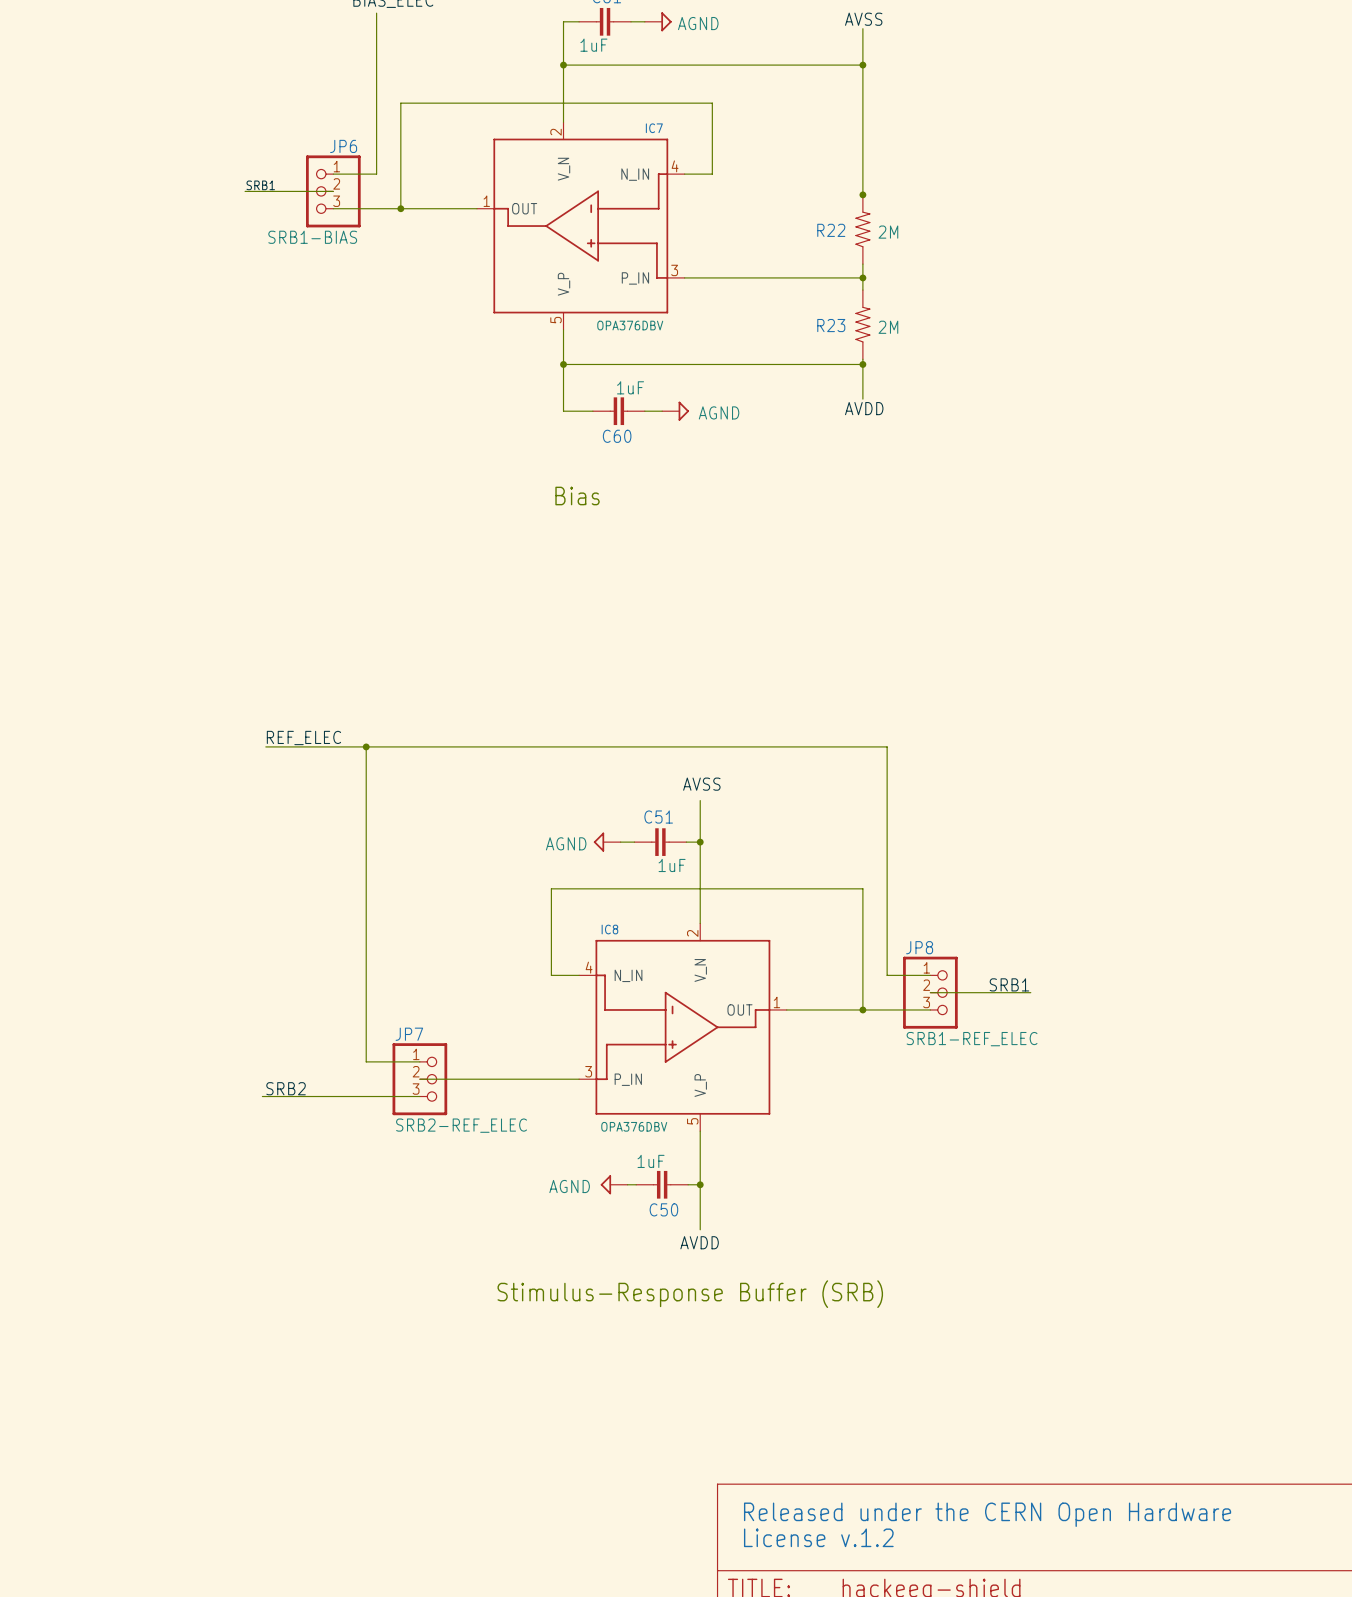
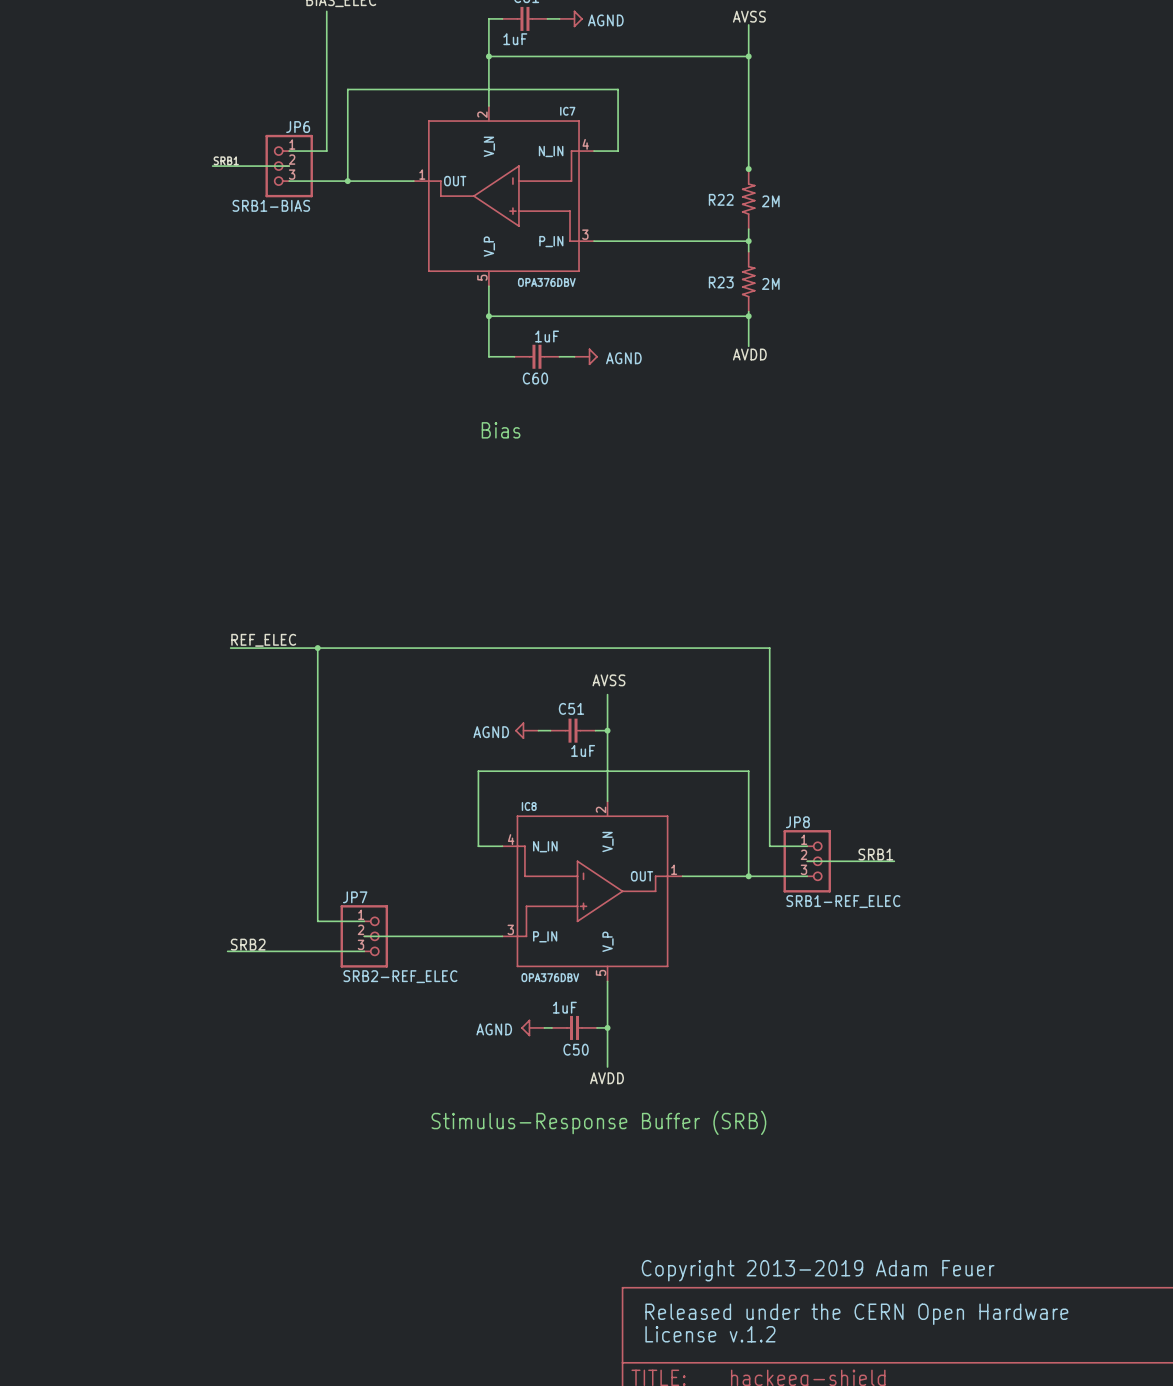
text: none -> Copyright 2013-2019 Adam Feuer (818, 1270)

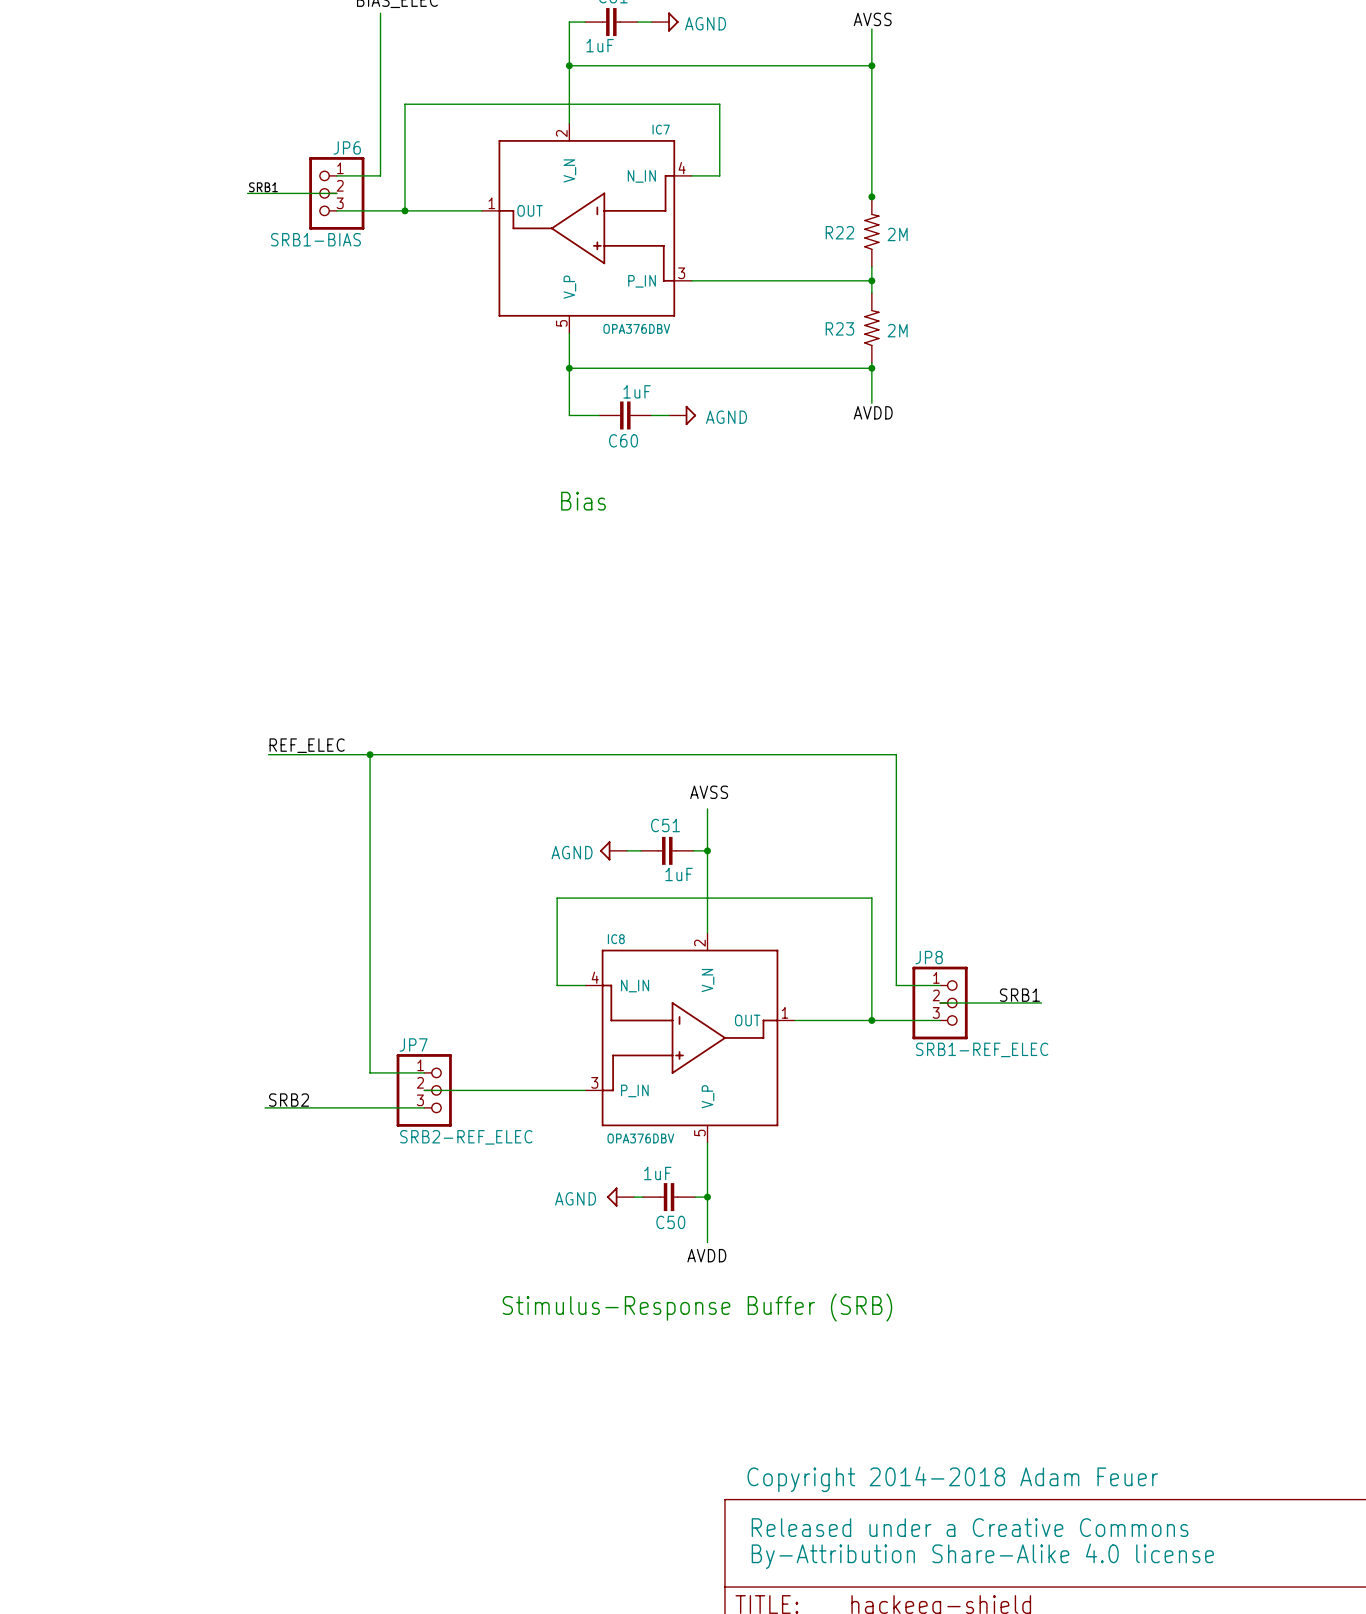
text: Copyright 2013-2019 Adam Feuer (818, 1270) -> Copyright 2014-2018 Adam Feuer (952, 1479)
text: Released under the CERN Open Hardware (856, 1314) -> Released under a Creative Commons (970, 1527)
text: License v.1.2 (710, 1334) -> By-Attribution Share-Alike 4.0 license (982, 1556)

